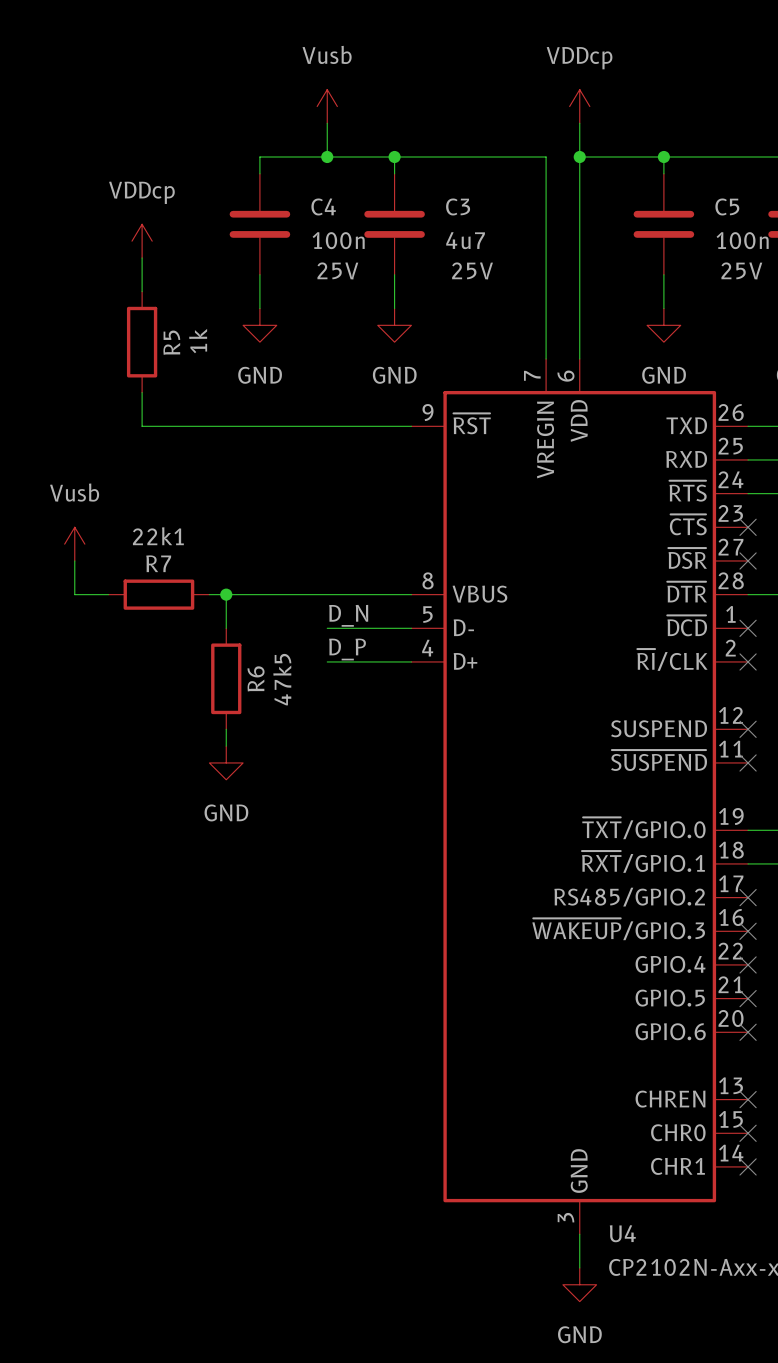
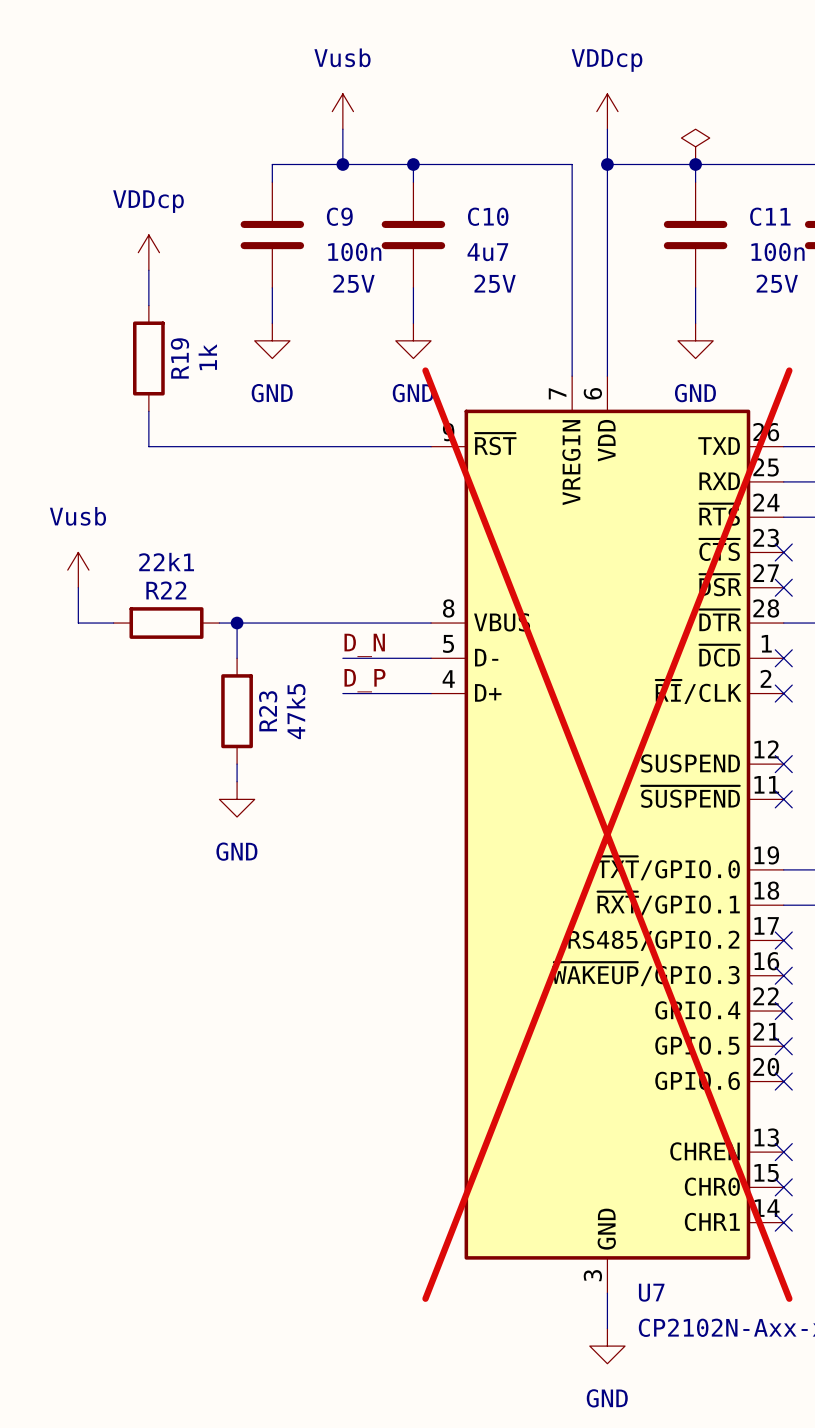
power symbol: none -> (695, 146)
C4 name: C4 (323, 206) -> C9 (339, 216)
C3 name: C3 (458, 206) -> C10 (488, 216)
C5 name: C5 (727, 206) -> C11 (770, 216)
R5 name: R5 (171, 342) -> R19 (179, 358)
R7 name: R7 (158, 563) -> R22 (166, 590)
R6 name: R6 (256, 678) -> R23 (268, 711)
U4 do-not-place cross: none -> (607, 834)
U4 name: U4 (622, 1233) -> U7 (651, 1292)

